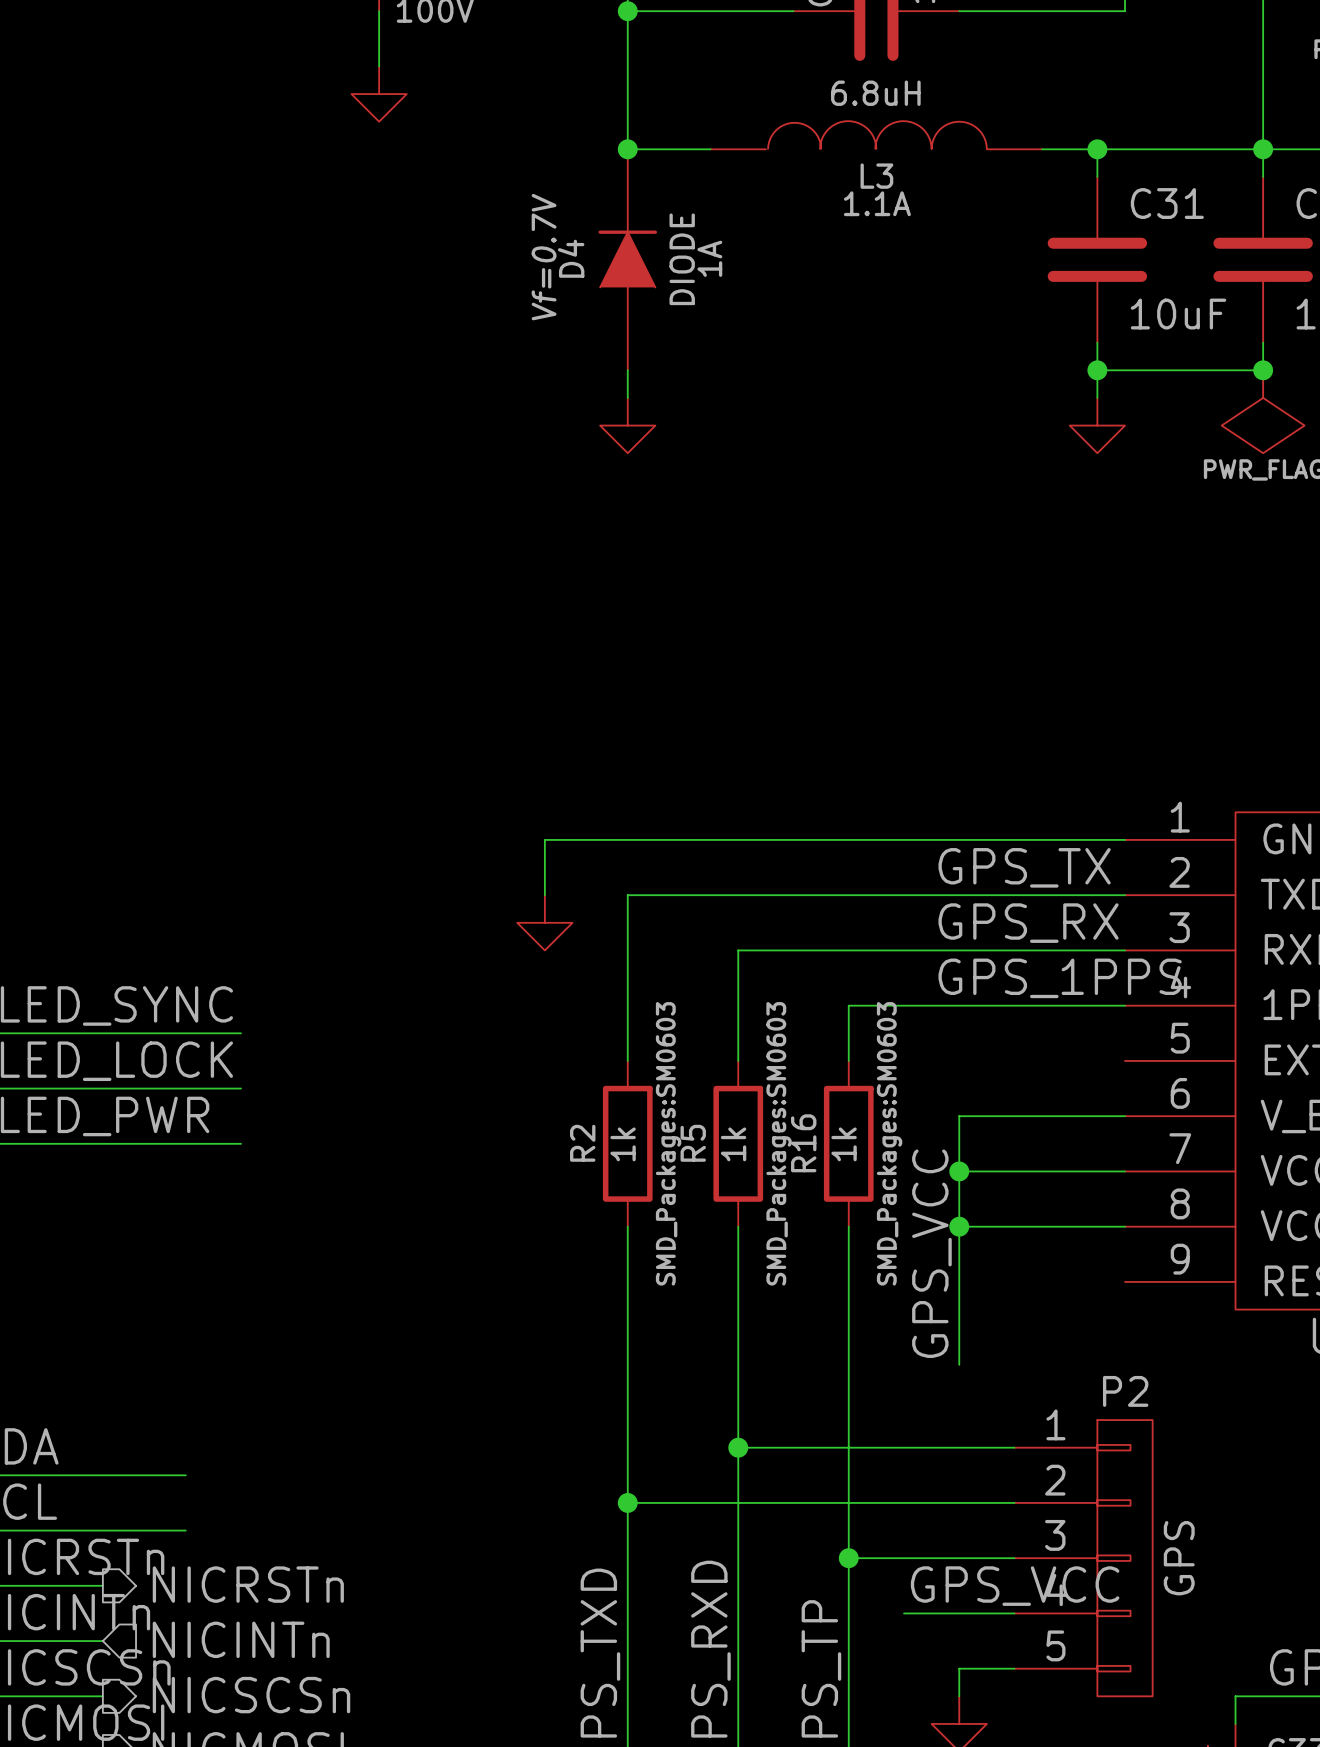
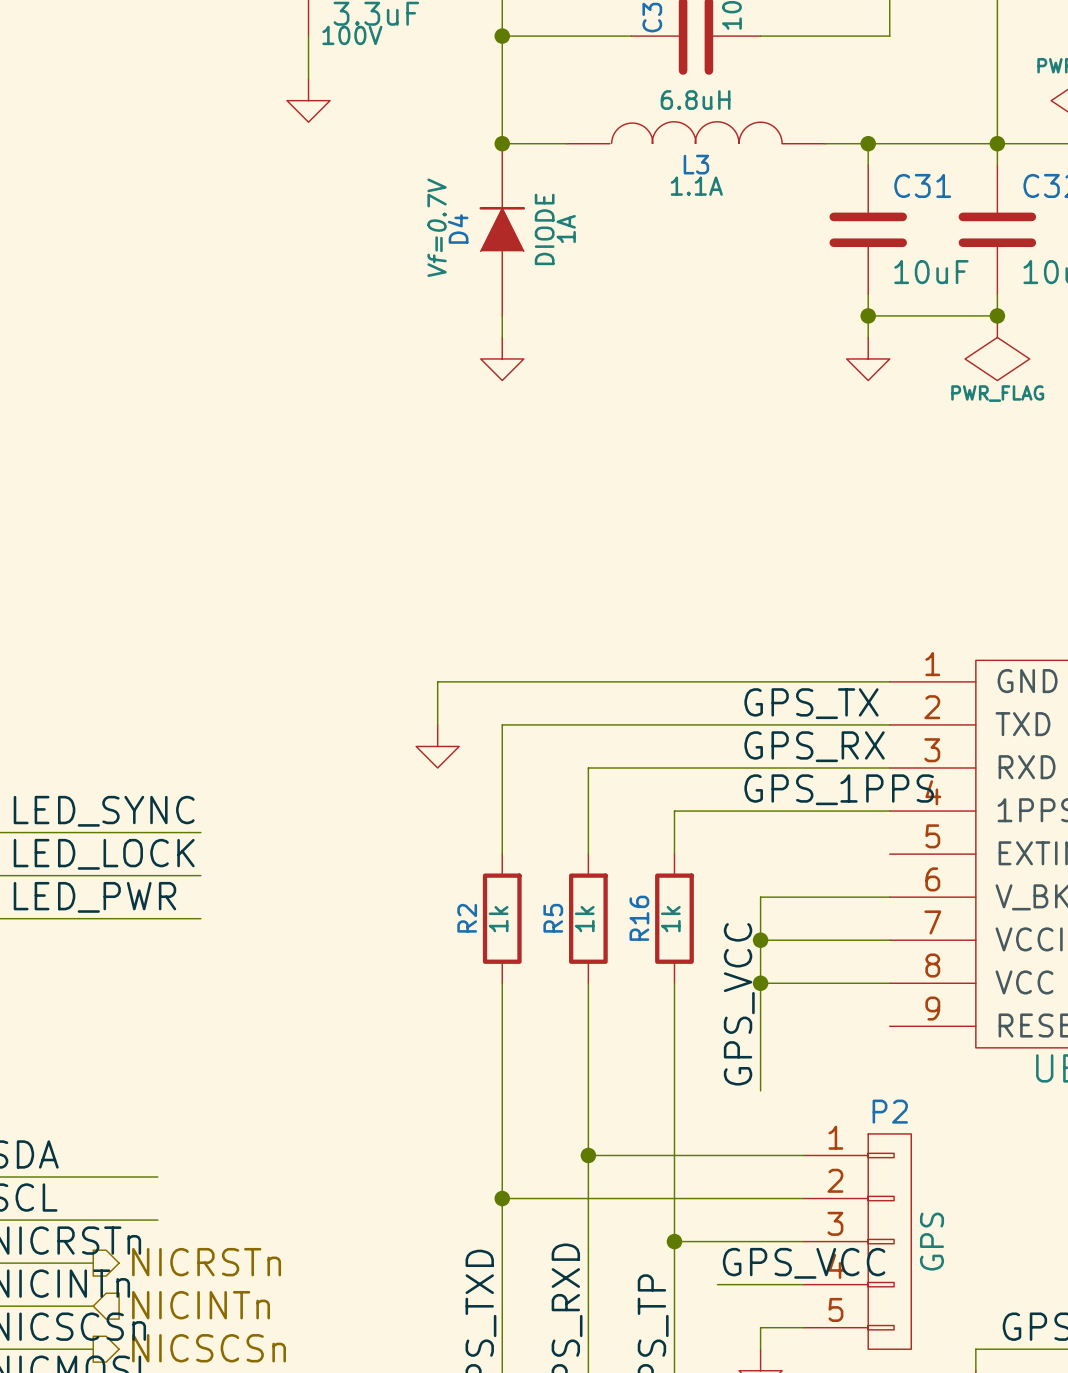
R2 text: SMD_Packages:SM0603 (668, 1143) -> none
R5 text: SMD_Packages:SM0603 (779, 1143) -> none
R16 text: SMD_Packages:SM0603 (889, 1143) -> none

